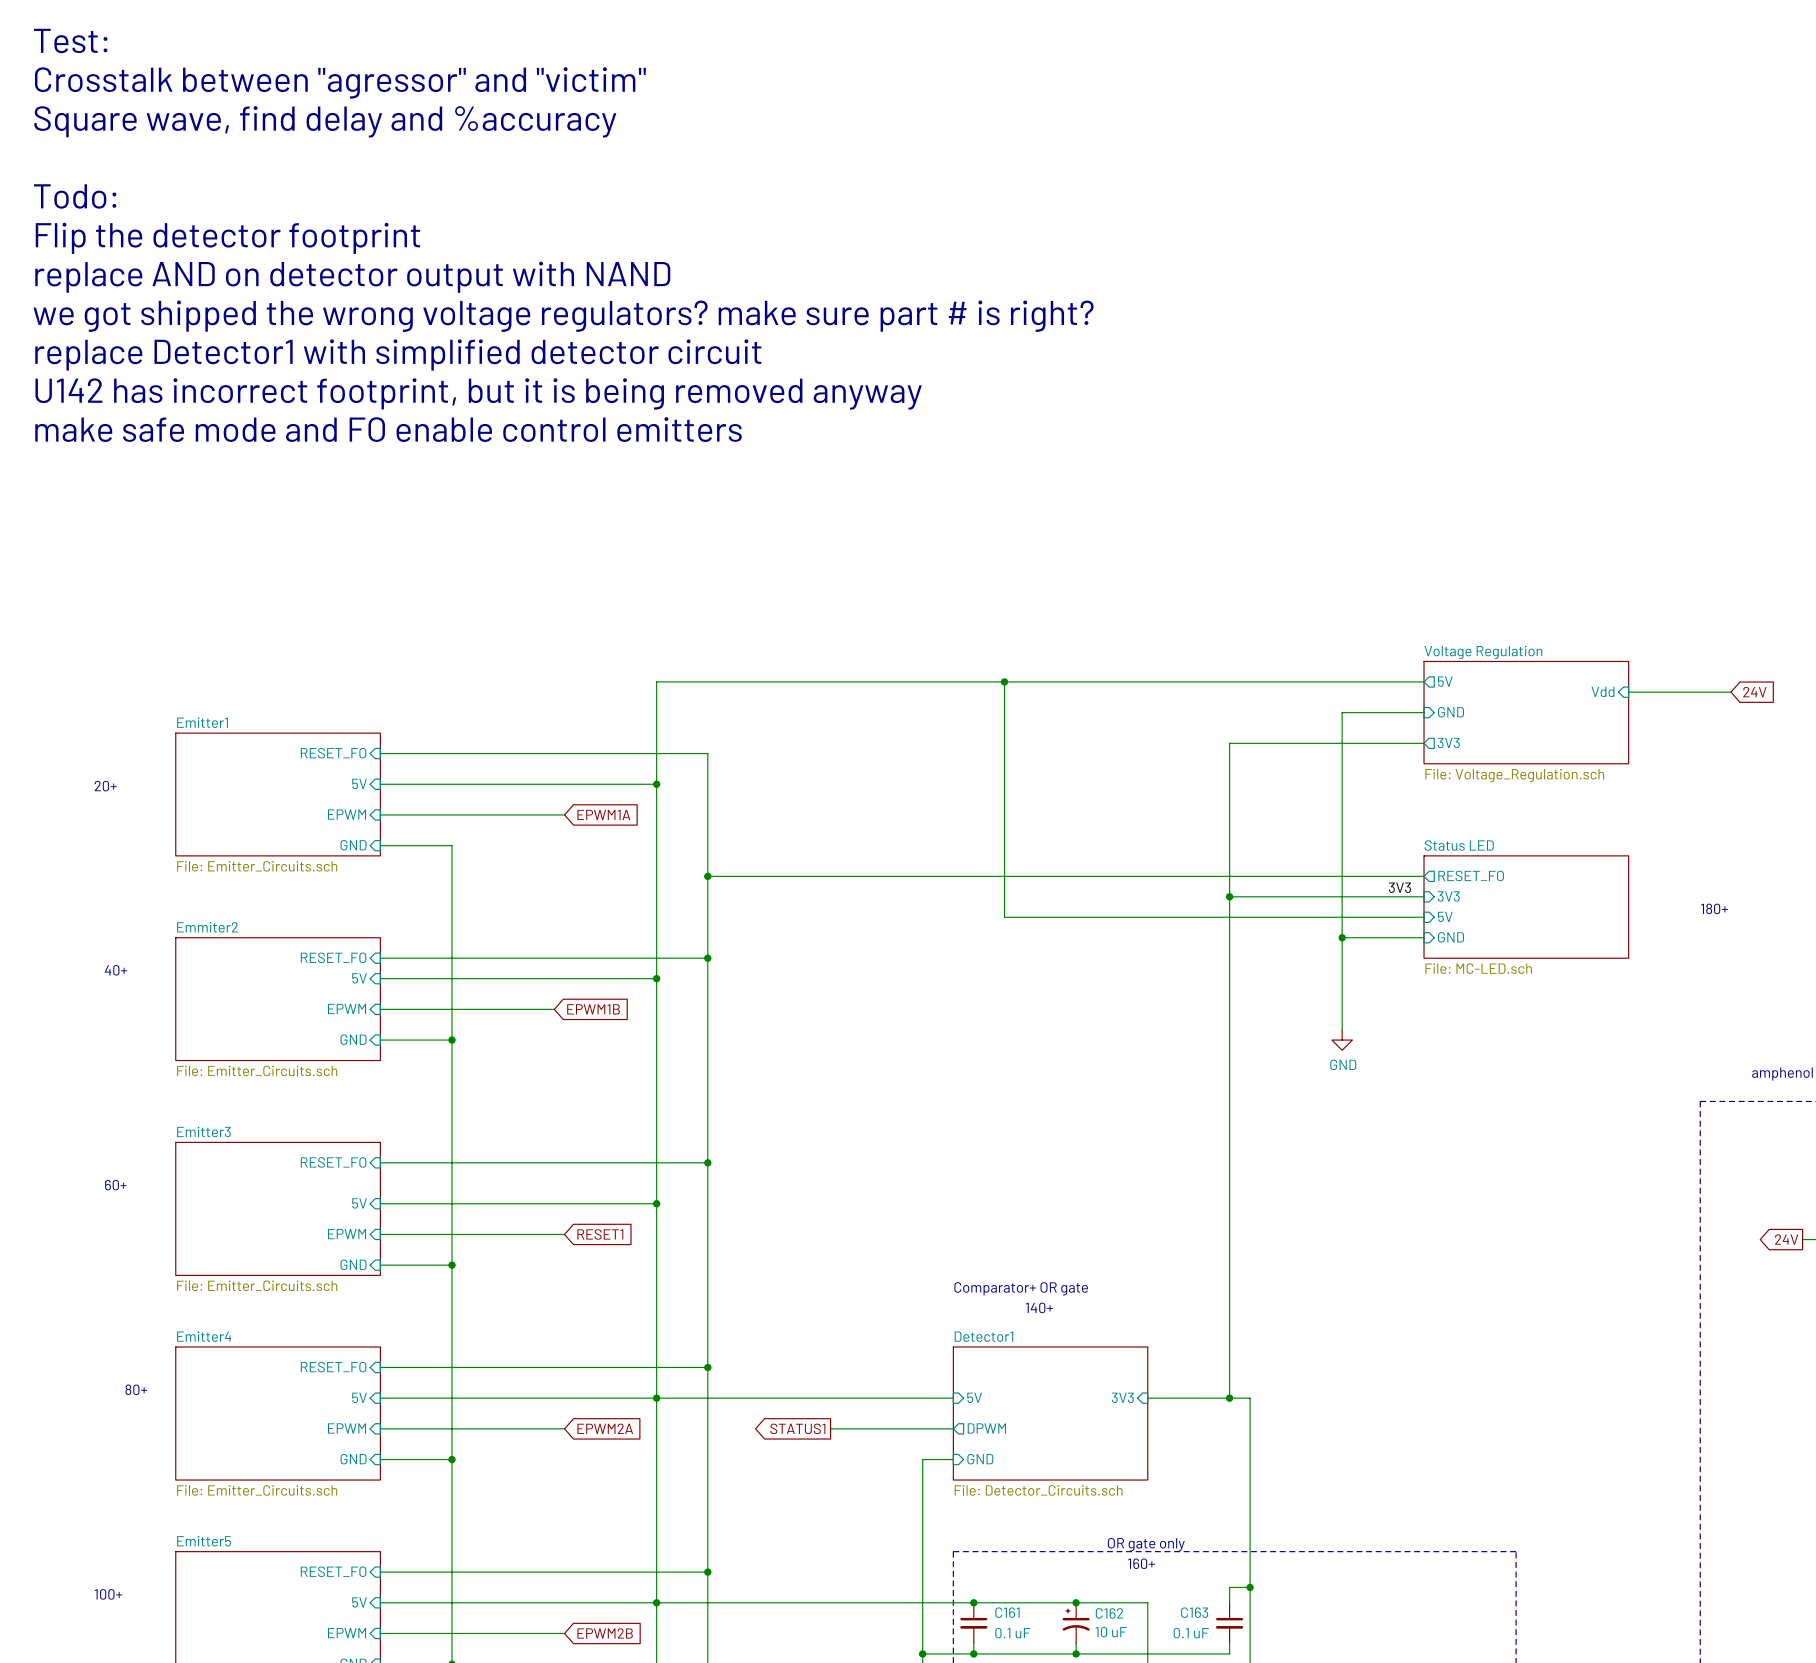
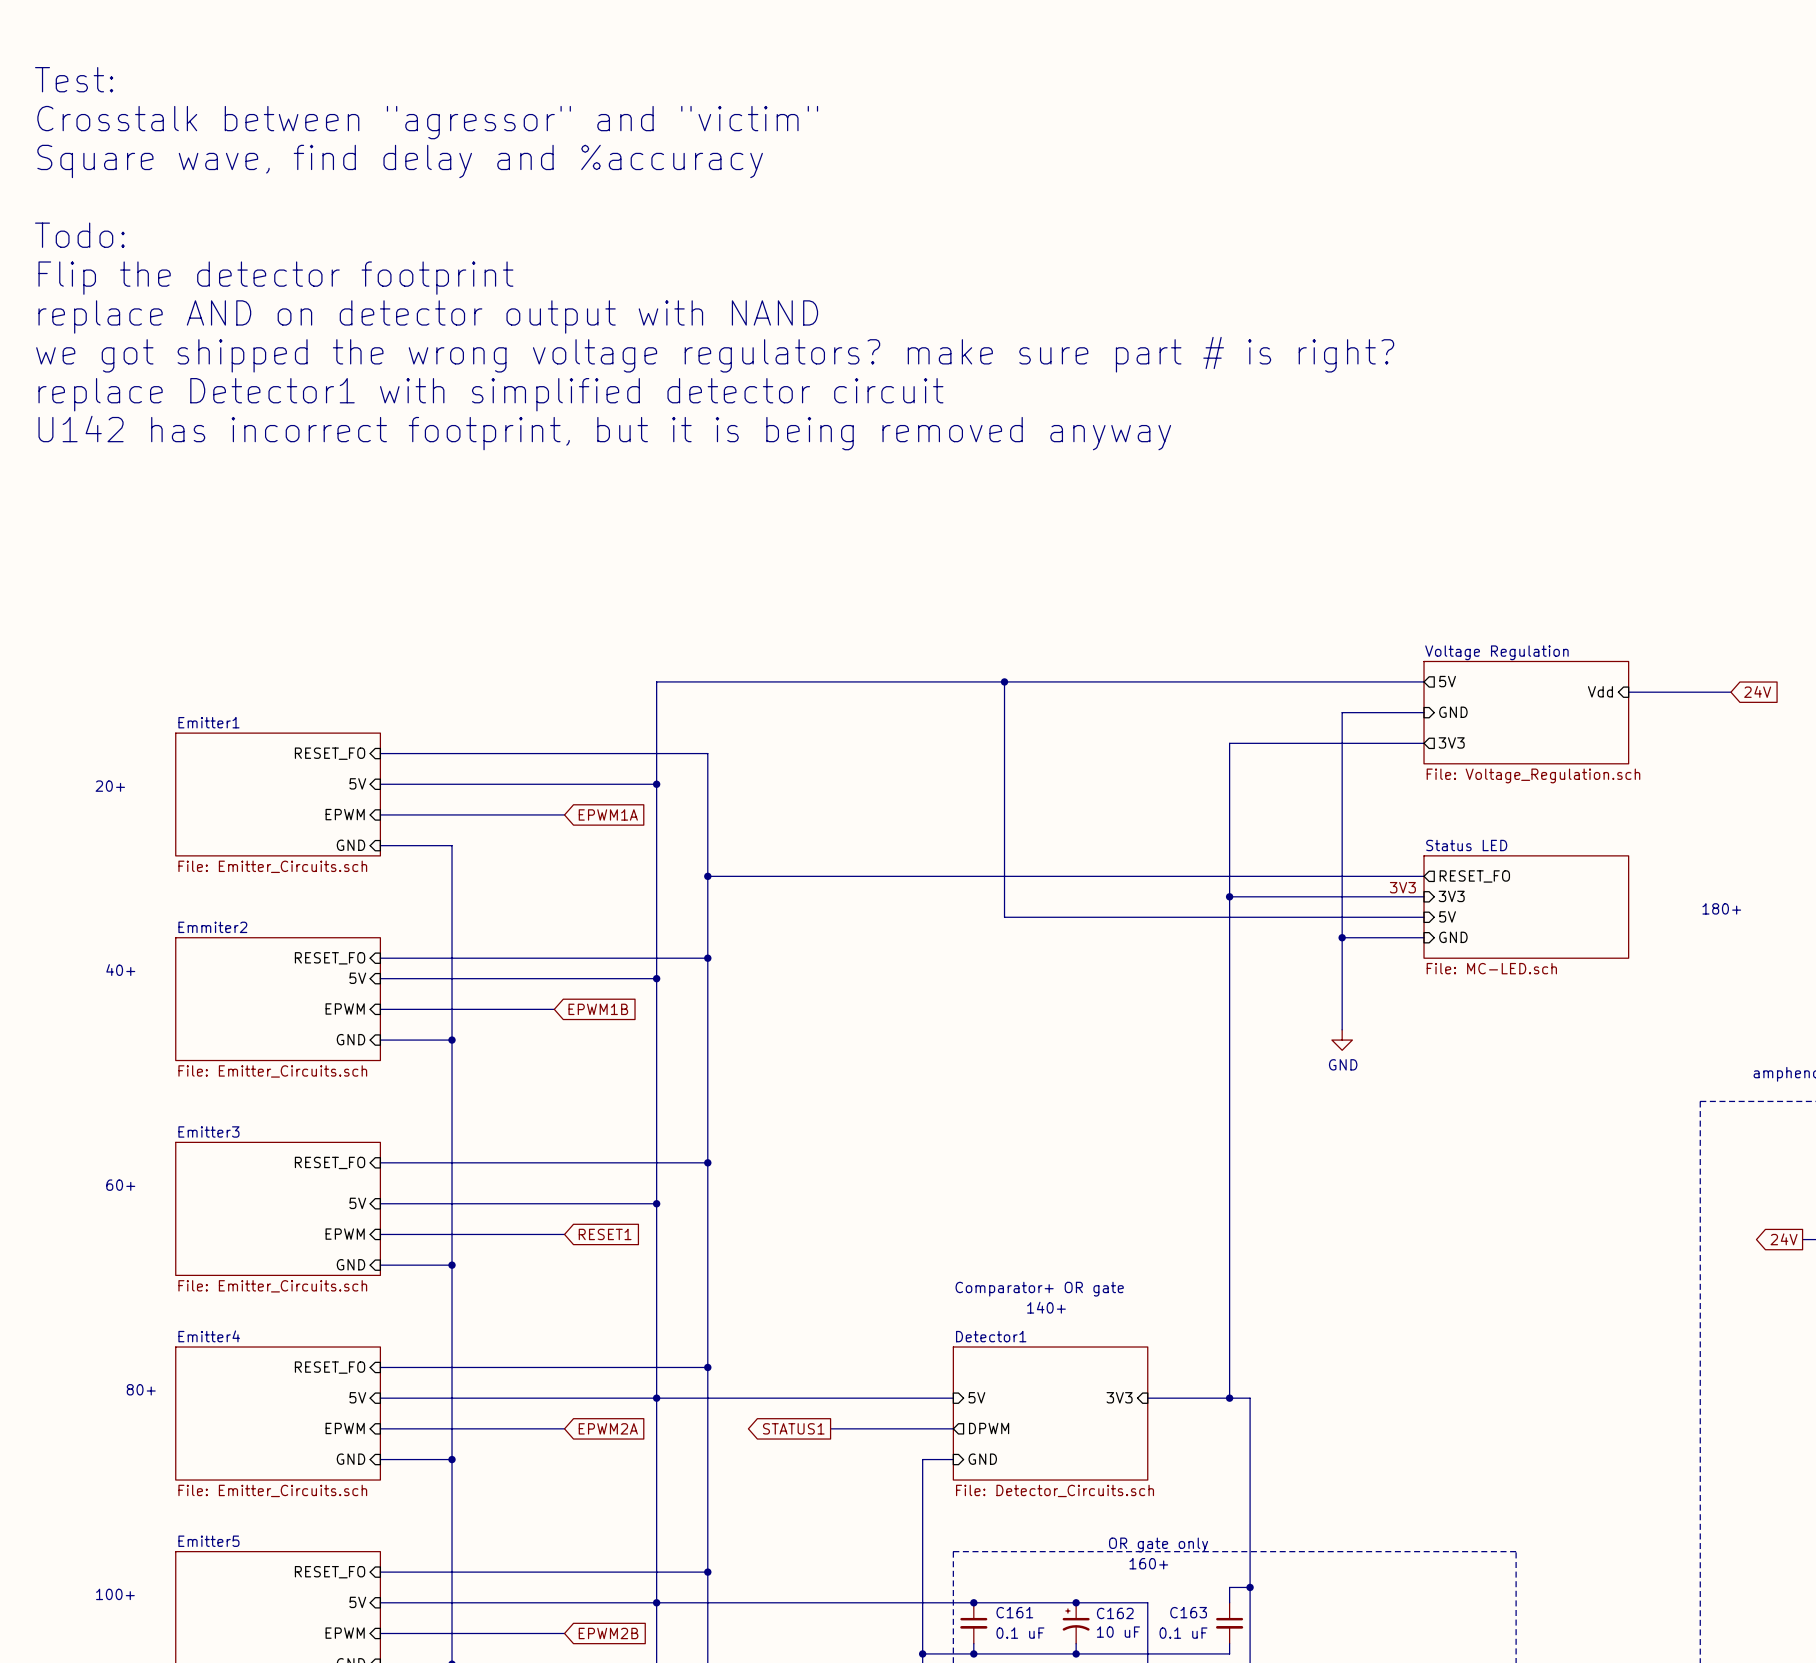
text: Test: (70, 40) -> none
text: Crosstalk between "agressor" and "victim" (340, 82) -> Test: (74, 79)
text: Square wave, find delay and %accuracy (325, 121) -> Crosstalk between "agressor" and "victim" (427, 122)
text: none -> Square wave, find delay and %accuracy (400, 161)
text: Todo: (75, 196) -> none
text: Flip the detector footprint (227, 238) -> Todo: (79, 235)
text: replace AND on detector output with NAND (352, 277) -> Flip the detector footprint (275, 278)
text: we got shipped the wrong voltage regulators? make sure part # is right? (563, 316) -> replace AND on detector output with NAND (428, 316)
text: replace Detector1 with simplified detector circuit (398, 355) -> we got shipped the wrong voltage regulators? make sure part # is right? (715, 354)
text: U142 has incorrect footprint, but it is being removed anyway (478, 393) -> replace Detector1 with simplified detector circuit (490, 394)
text: make safe mode and FO enable control emitters (388, 429) -> U142 has incorrect footprint, but it is being removed anyway (604, 433)

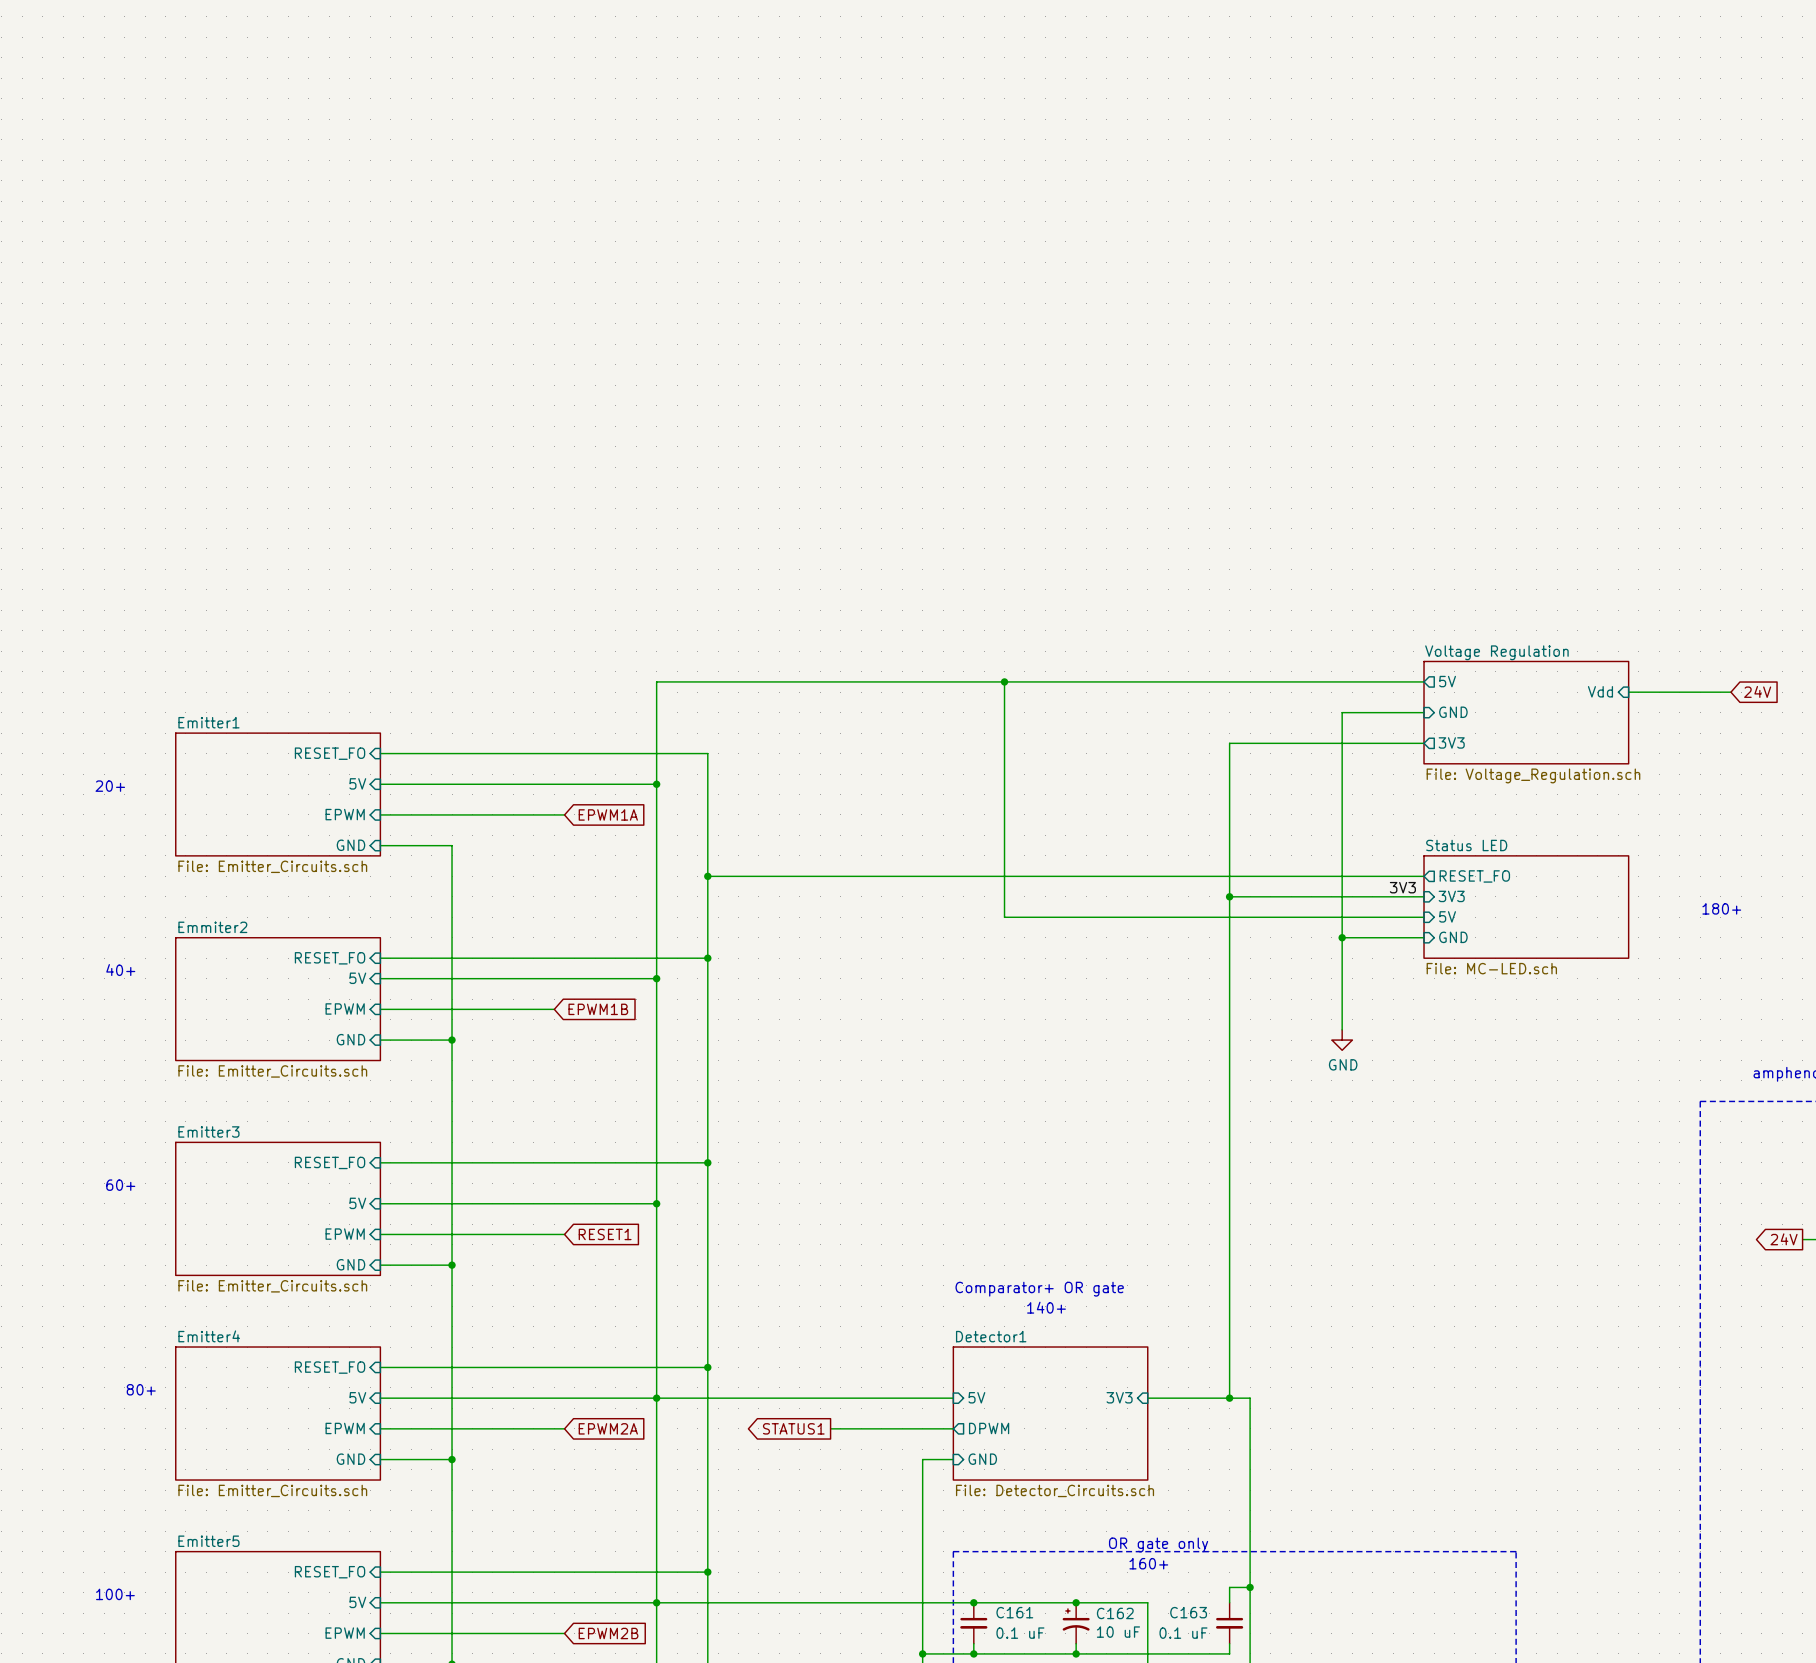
text: Test: (74, 79) -> none
text: Crosstalk between "agressor" and "victim" (427, 122) -> none
text: Square wave, find delay and %accuracy (400, 161) -> none
text: Todo: (79, 235) -> none
text: Flip the detector footprint (275, 278) -> none
text: replace AND on detector output with NAND (428, 316) -> none
text: we got shipped the wrong voltage regulators? make sure part # is right? (715, 354) -> none
text: replace Detector1 with simplified detector circuit (490, 394) -> none
text: U142 has incorrect footprint, but it is being removed anyway (604, 433) -> none

